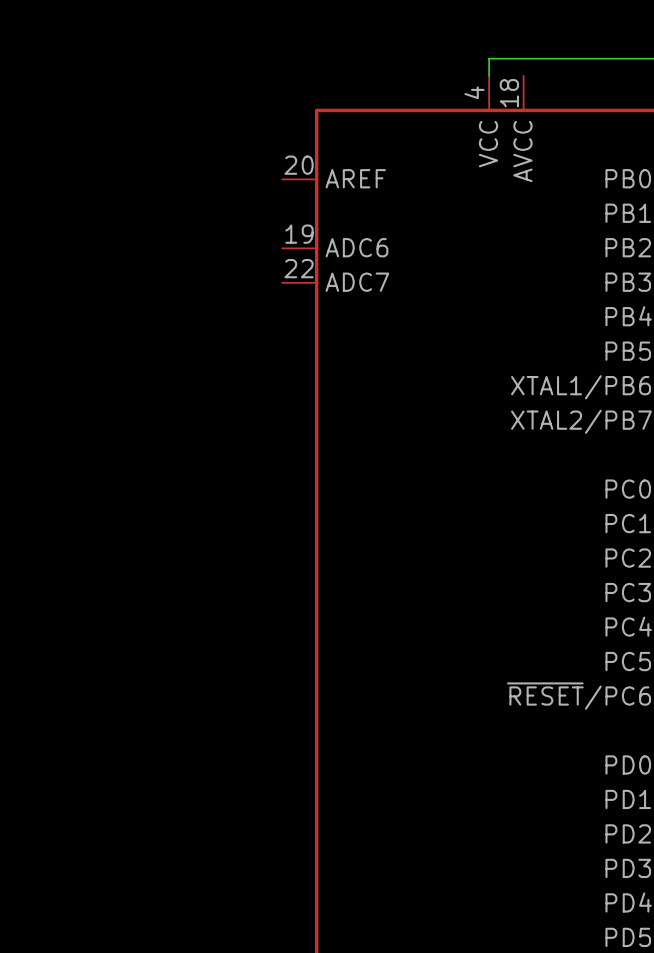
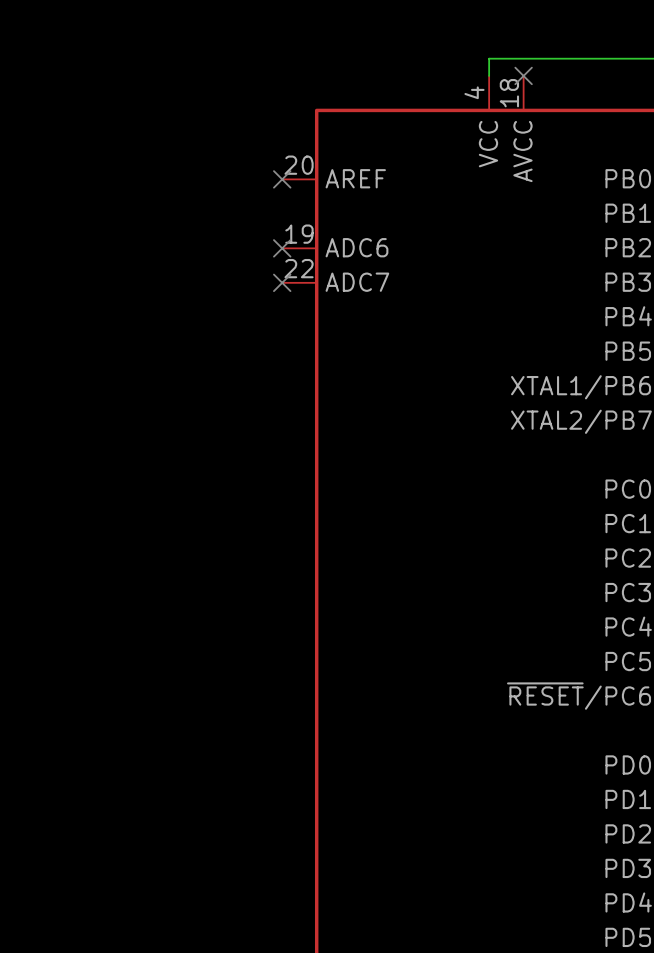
no-connect mark: none -> (523, 75)
no-connect mark: none -> (282, 179)
no-connect mark: none -> (282, 248)
no-connect mark: none -> (282, 282)

